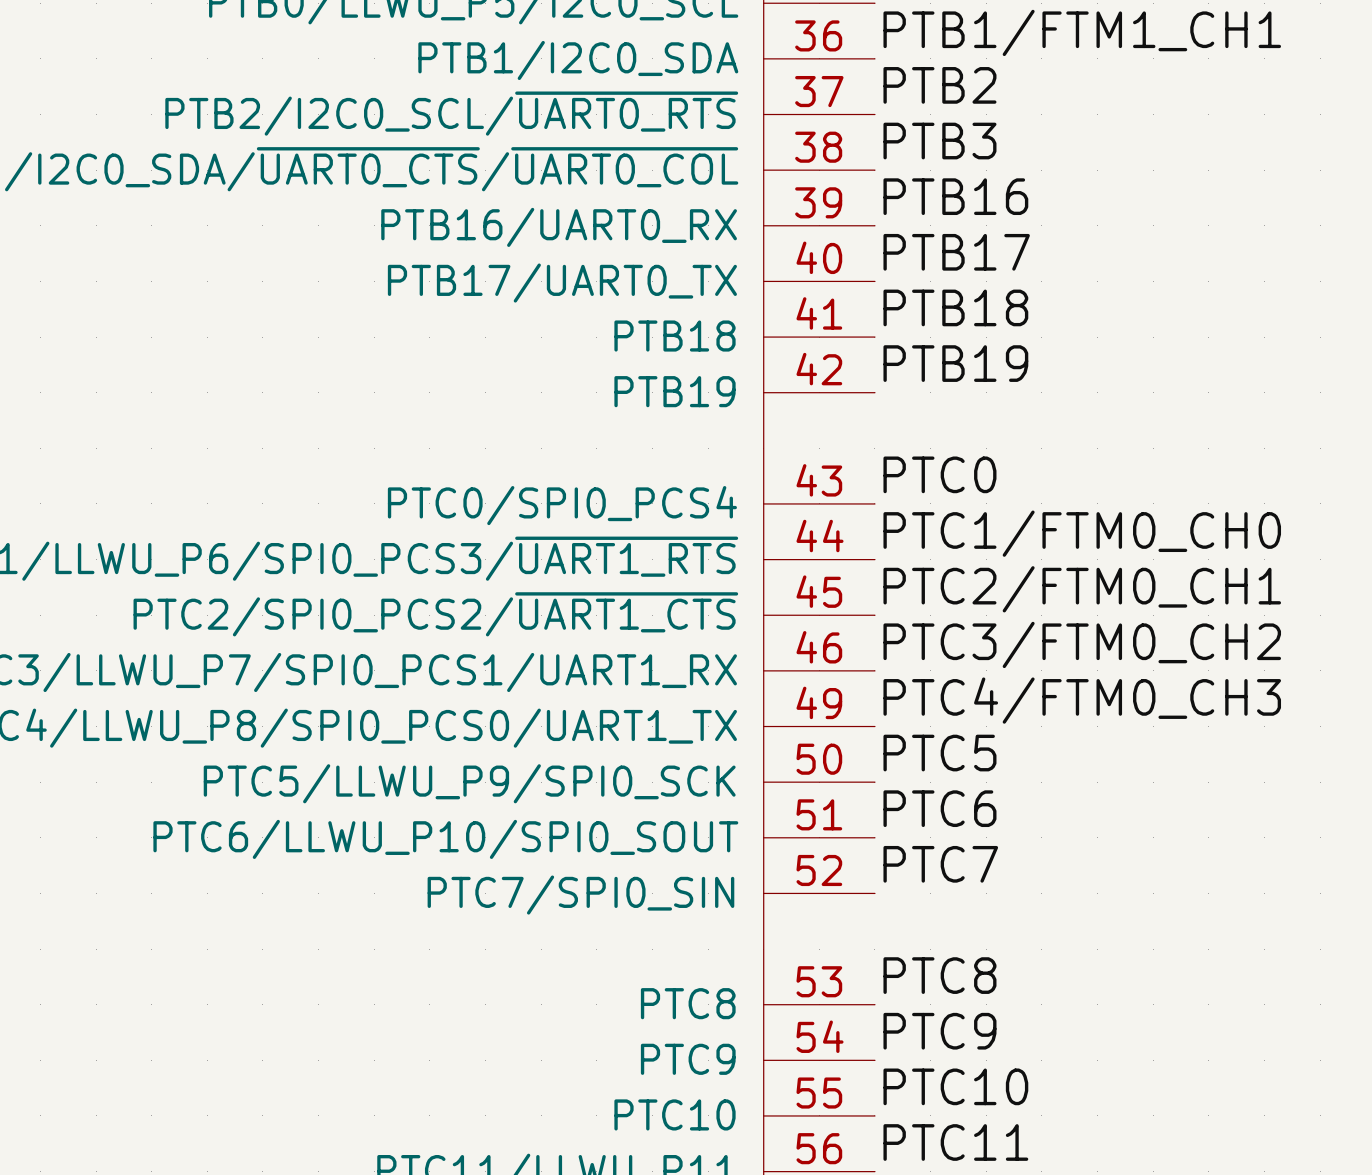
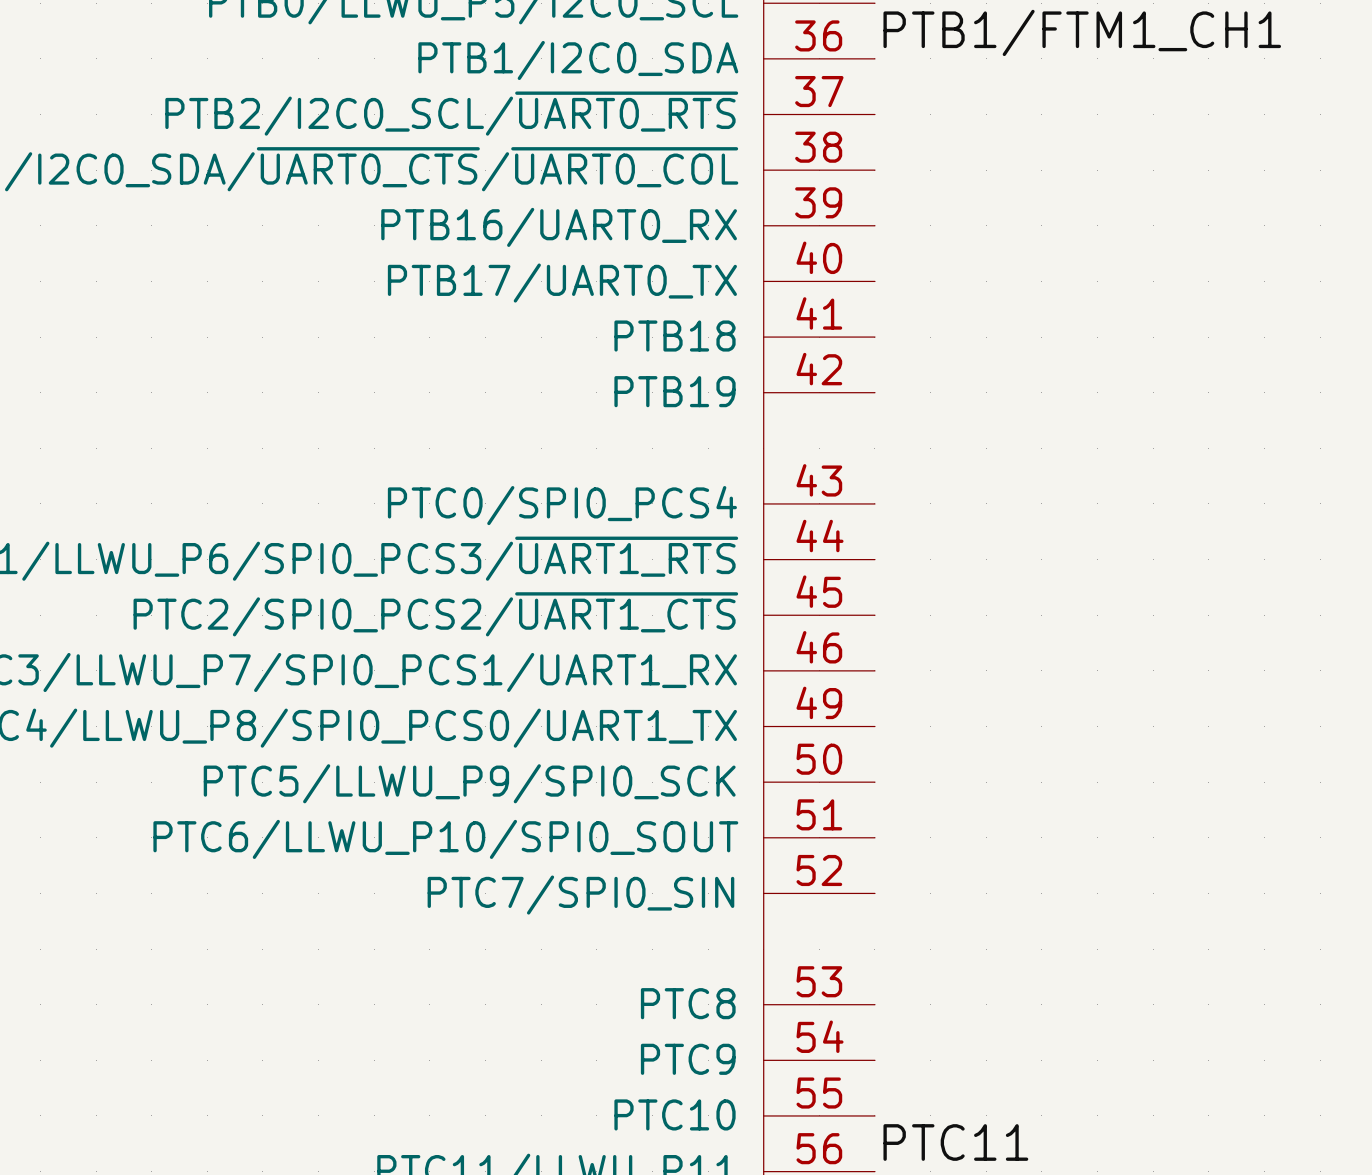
label: PTB2 (939, 85) -> none
label: PTB3 (939, 141) -> none
label: PTB16 (955, 196) -> none
label: PTB17 (956, 252) -> none
label: PTB18 (955, 307) -> none
label: PTB19 (955, 363) -> none
label: PTC0 (939, 474) -> none
label: PTC1/FTM0_CH0 (1082, 533) -> none
label: PTC2/FTM0_CH1 (1082, 589) -> none
label: PTC3/FTM0_CH2 (1082, 644) -> none
label: PTC4/FTM0_CH3 (1082, 700) -> none
label: PTC5 (939, 753) -> none
label: PTC6 (939, 808) -> none
label: PTC7 (940, 864) -> none
label: PTC8 (939, 975) -> none
label: PTC9 (939, 1031) -> none
label: PTC10 (955, 1086) -> none

